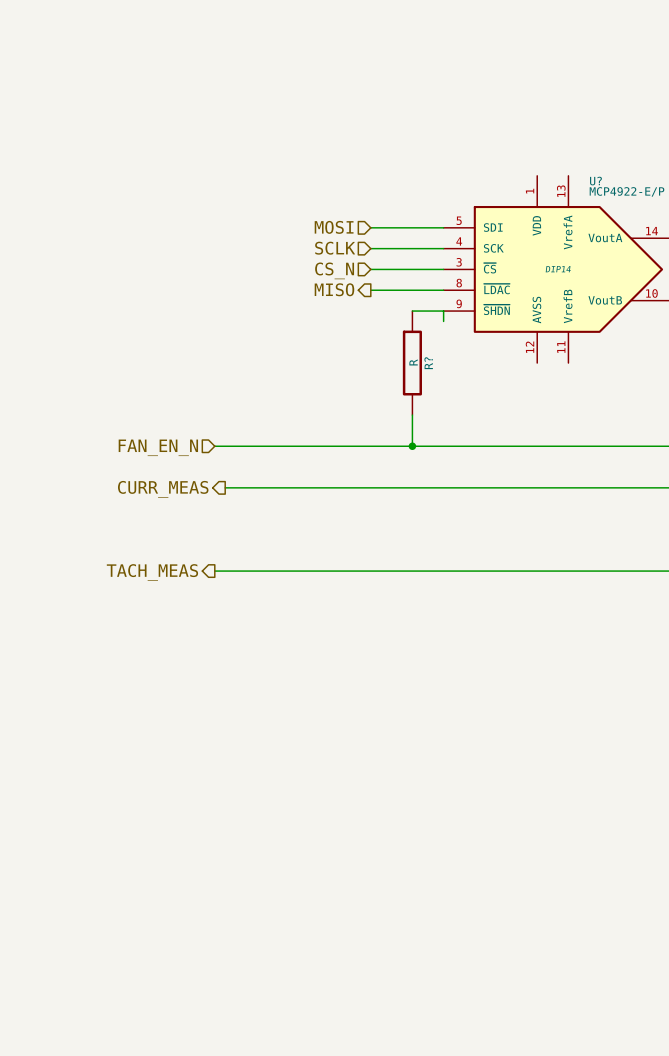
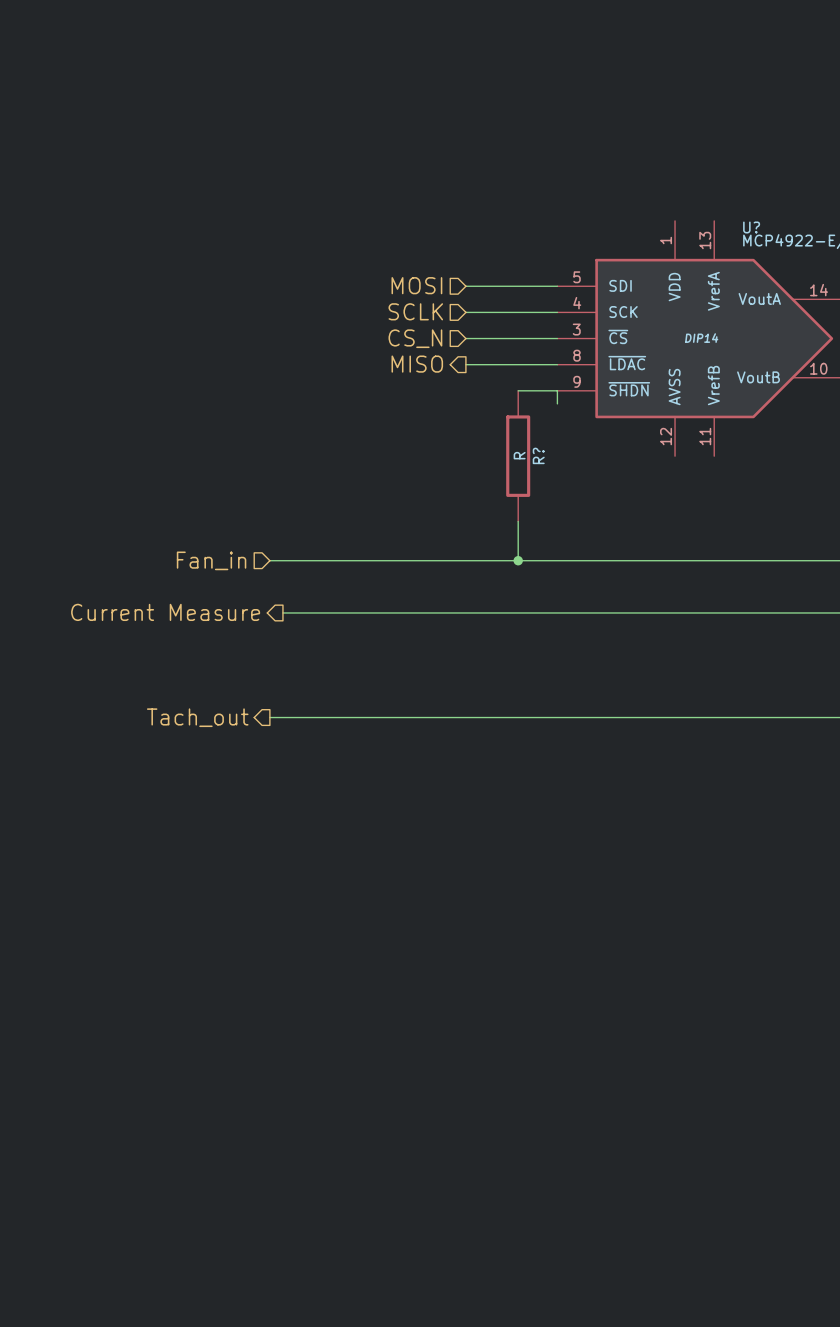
hierarchical label: FAN_EN_N (158, 447) -> Fan_in (211, 560)
hierarchical label: CURR_MEAS (163, 489) -> Current Measure (165, 612)
hierarchical label: TACH_MEAS (152, 572) -> Tach_out (197, 717)

